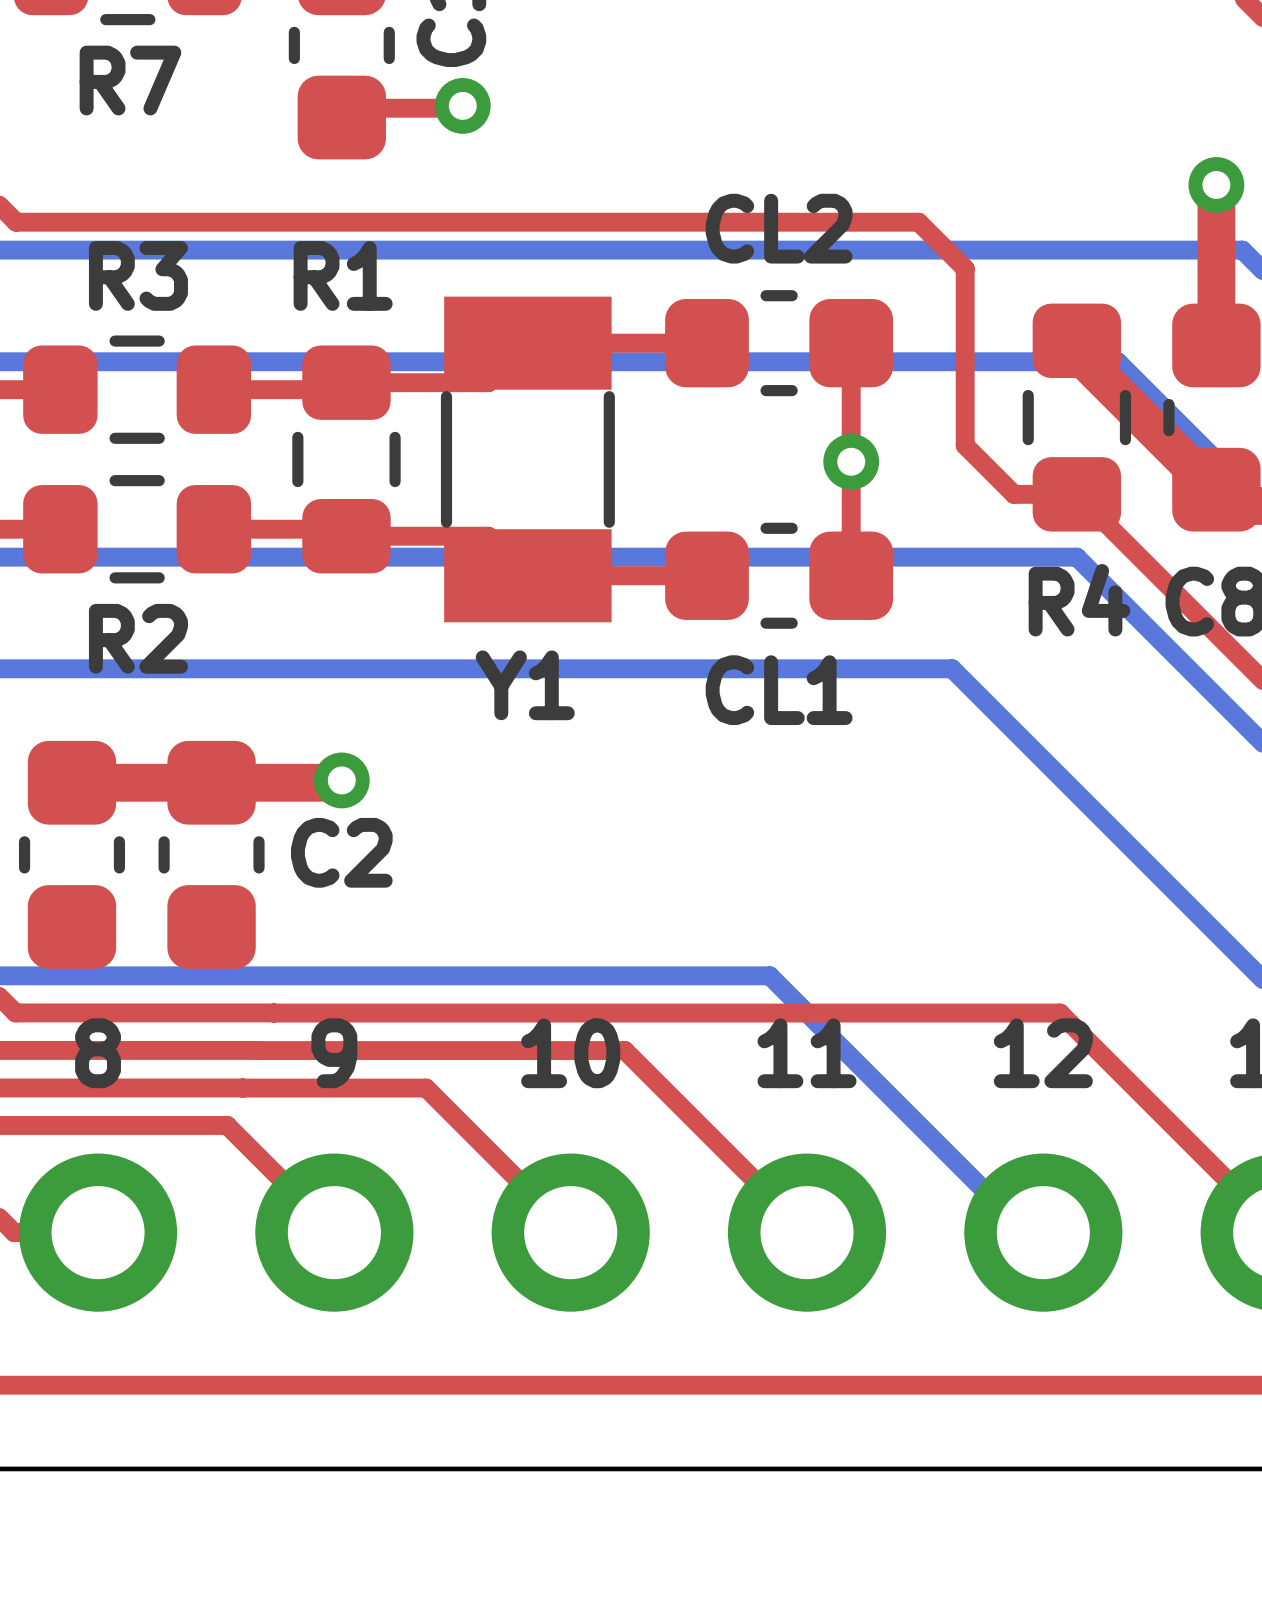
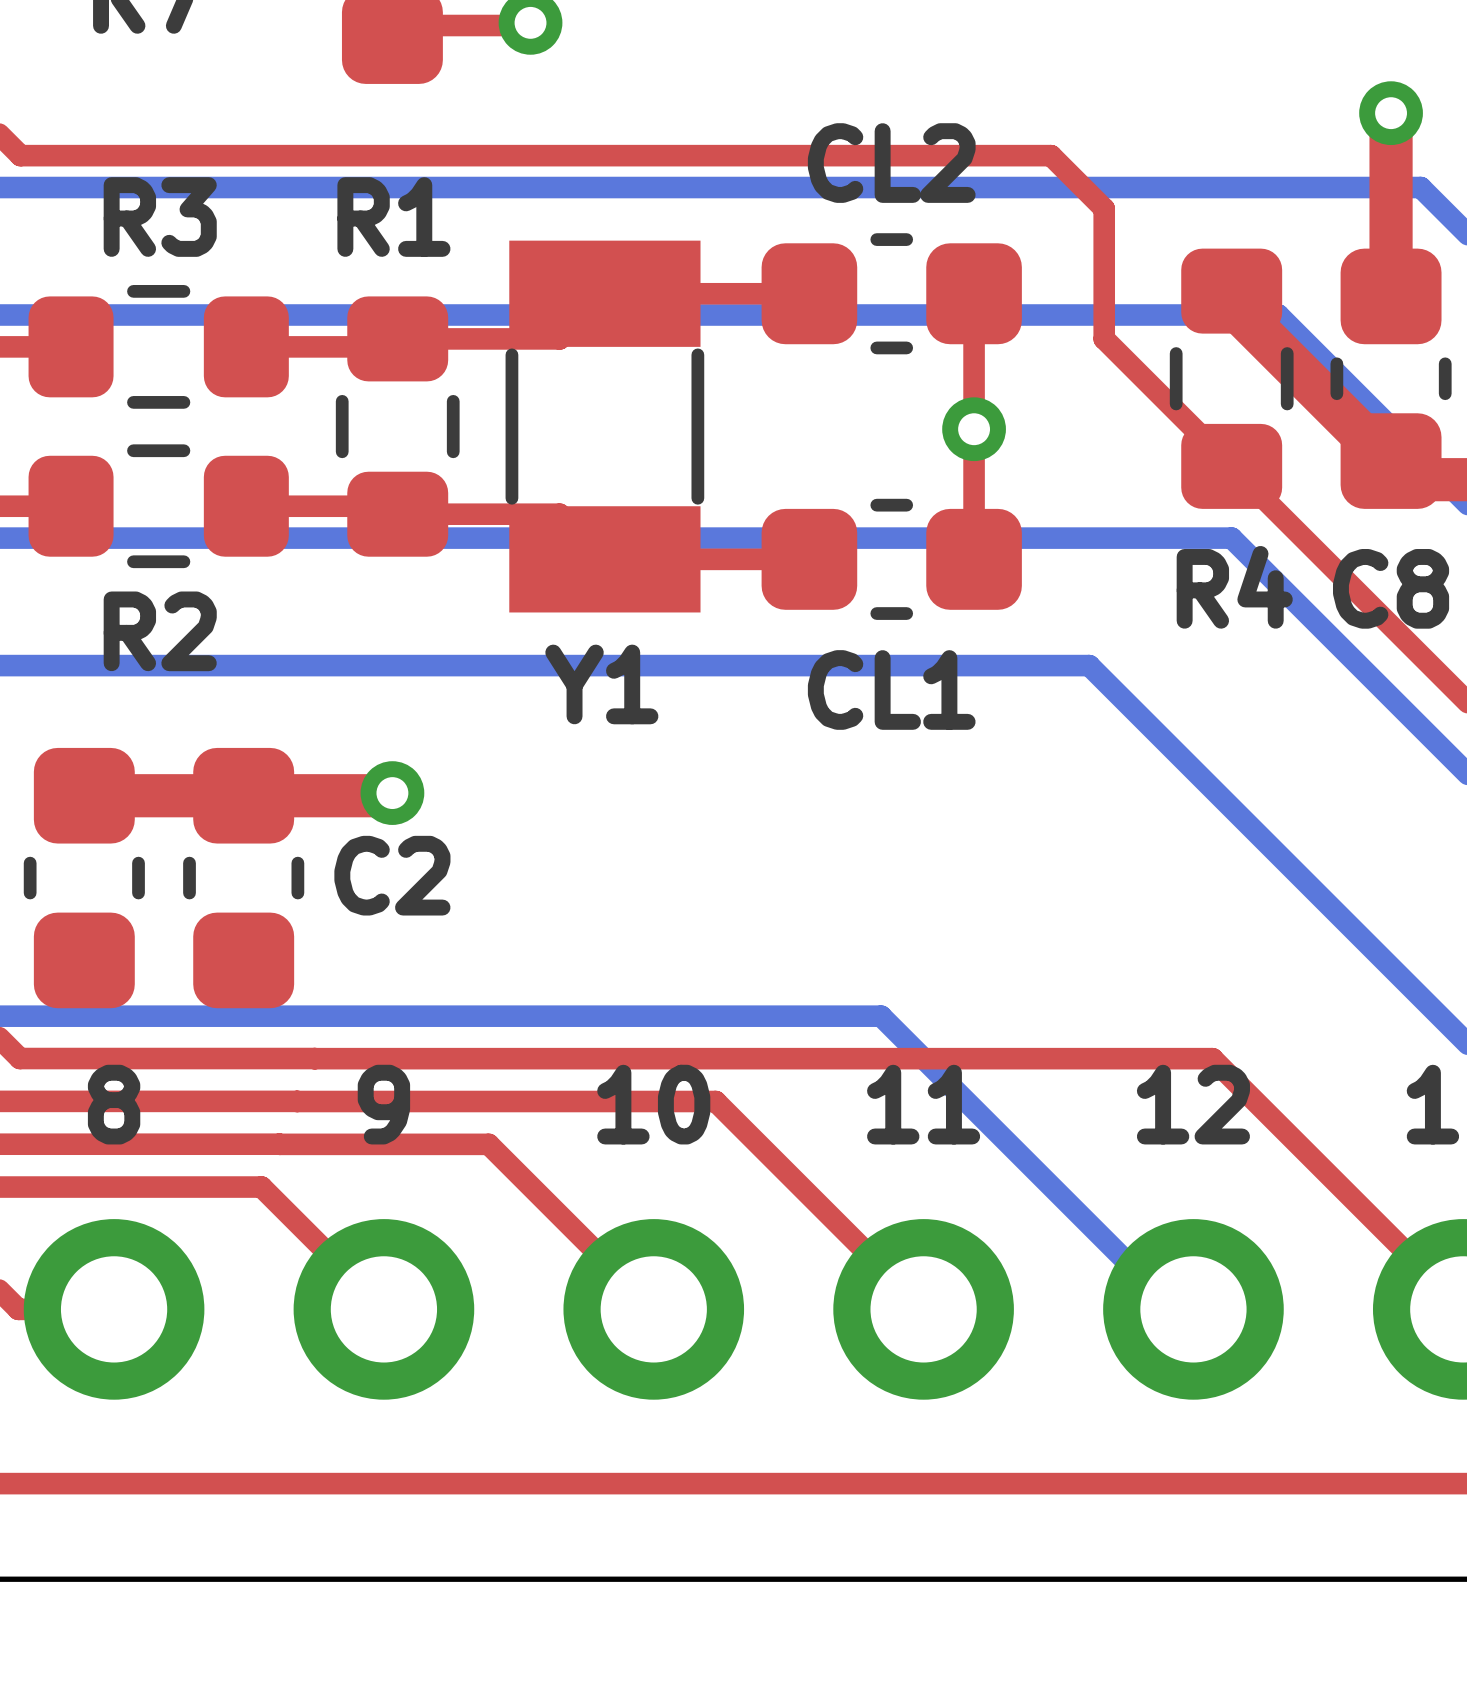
top track: (965, 382) (965, 445) (1014, 494) (1076, 494) -> (1104, 338) (1231, 466)

